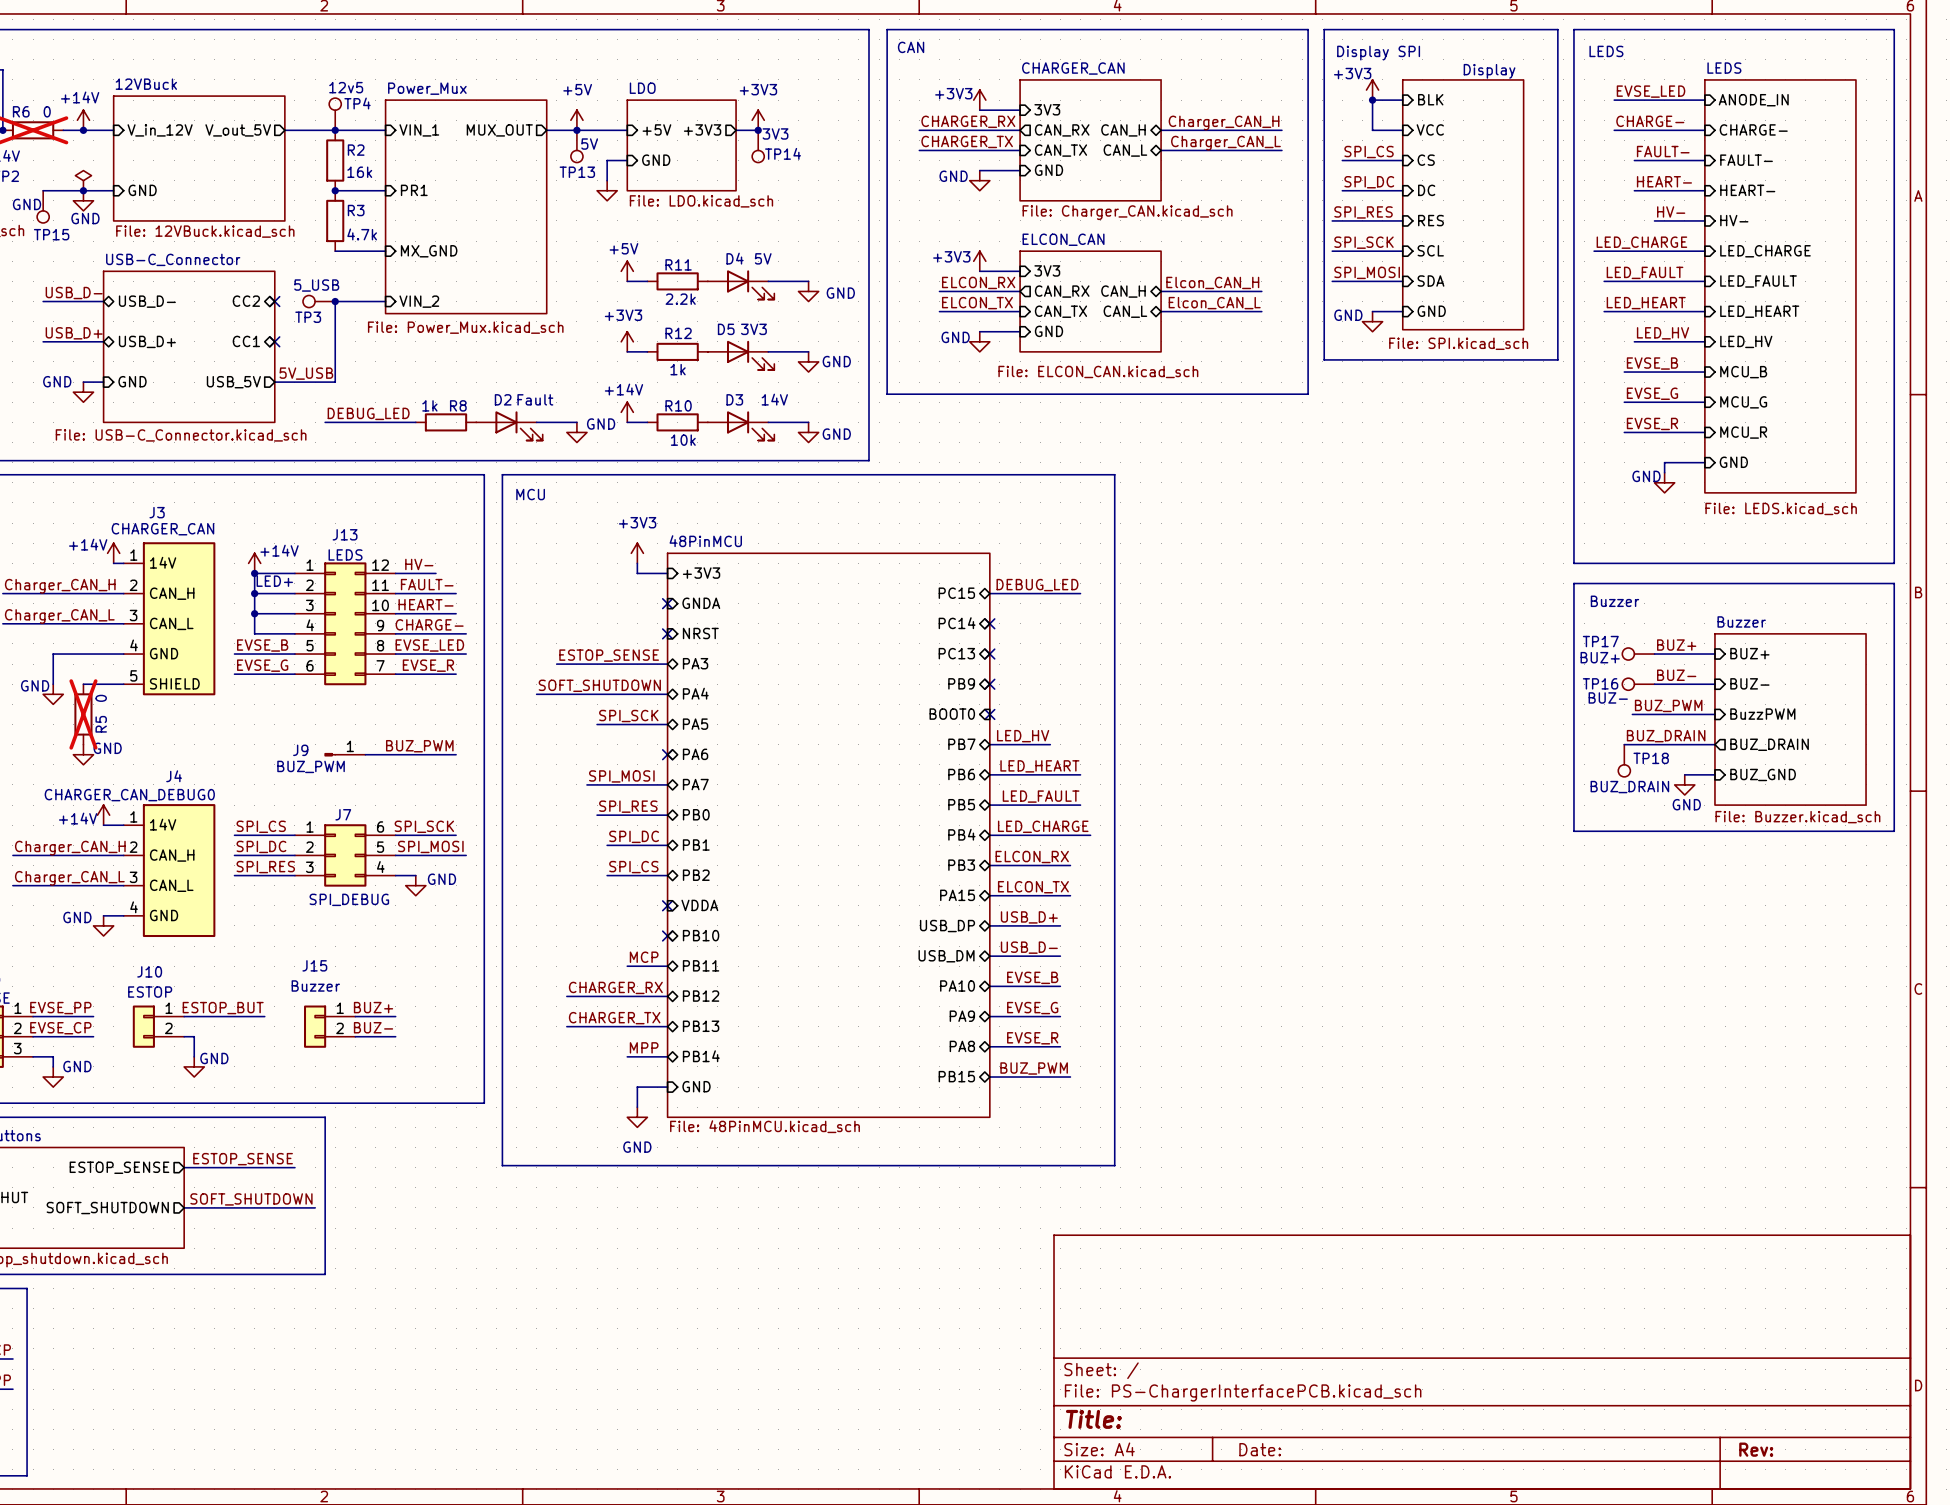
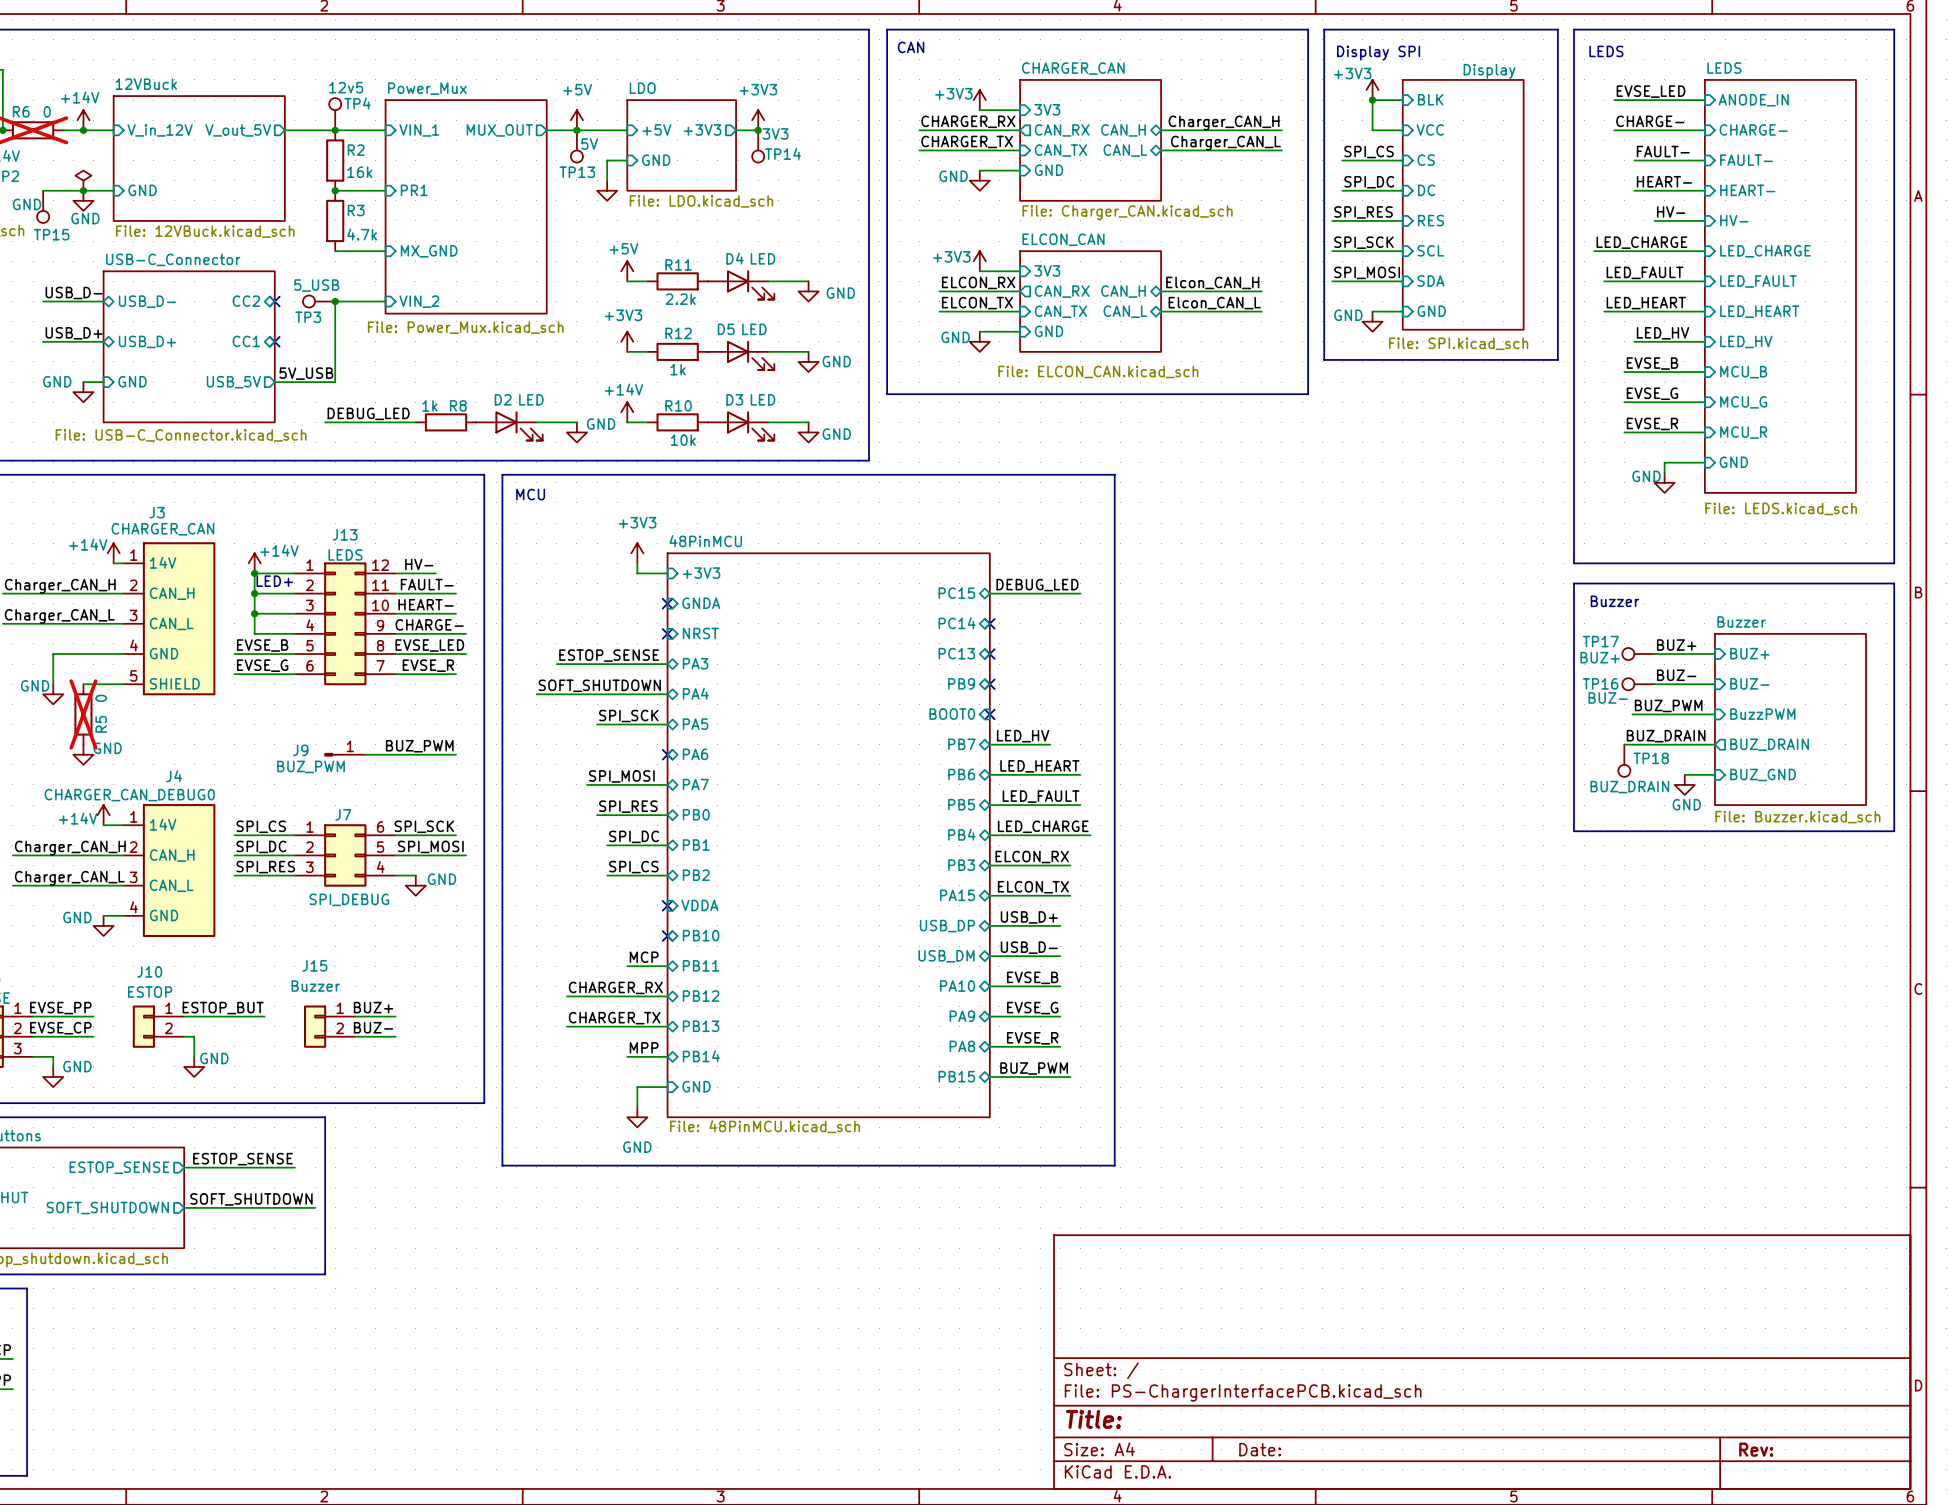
D4 value: 5V (763, 258) -> LED (762, 258)
D5 value: 3V3 (753, 329) -> LED (754, 329)
D2 value: Fault (535, 399) -> LED (531, 399)
D3 value: 14V (774, 399) -> LED (762, 399)

